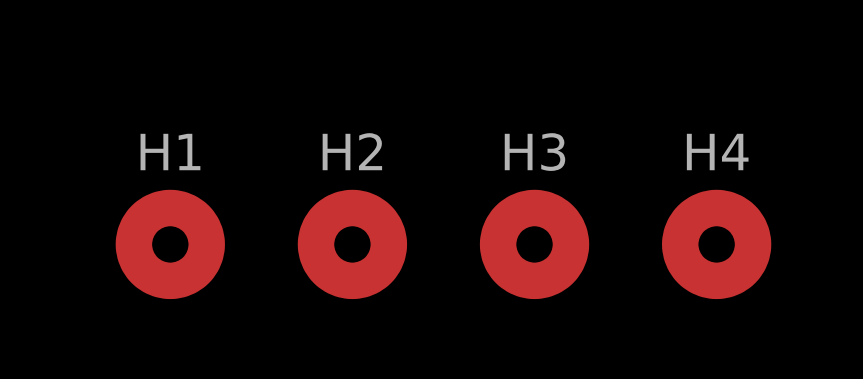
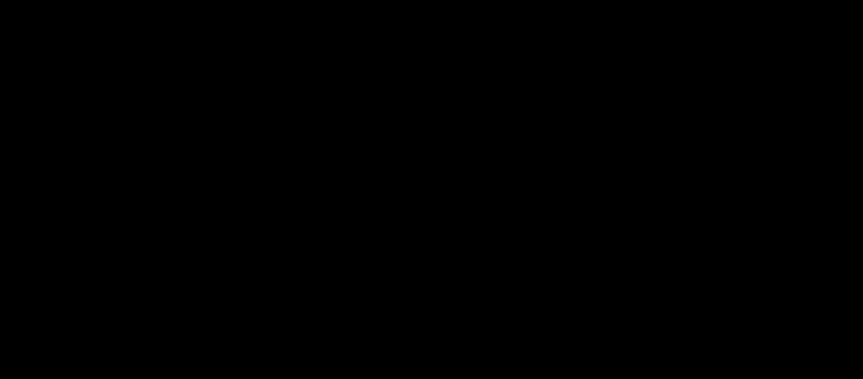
H1: (170, 244) -> none
H2: (352, 244) -> none
H3: (534, 244) -> none
H4: (716, 244) -> none

